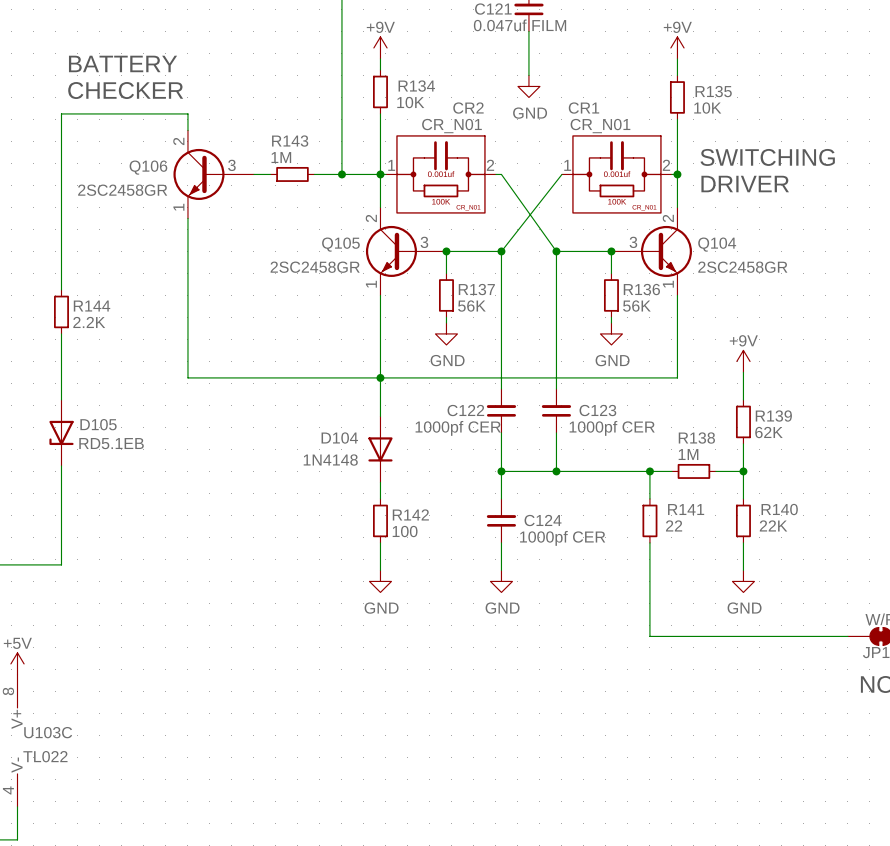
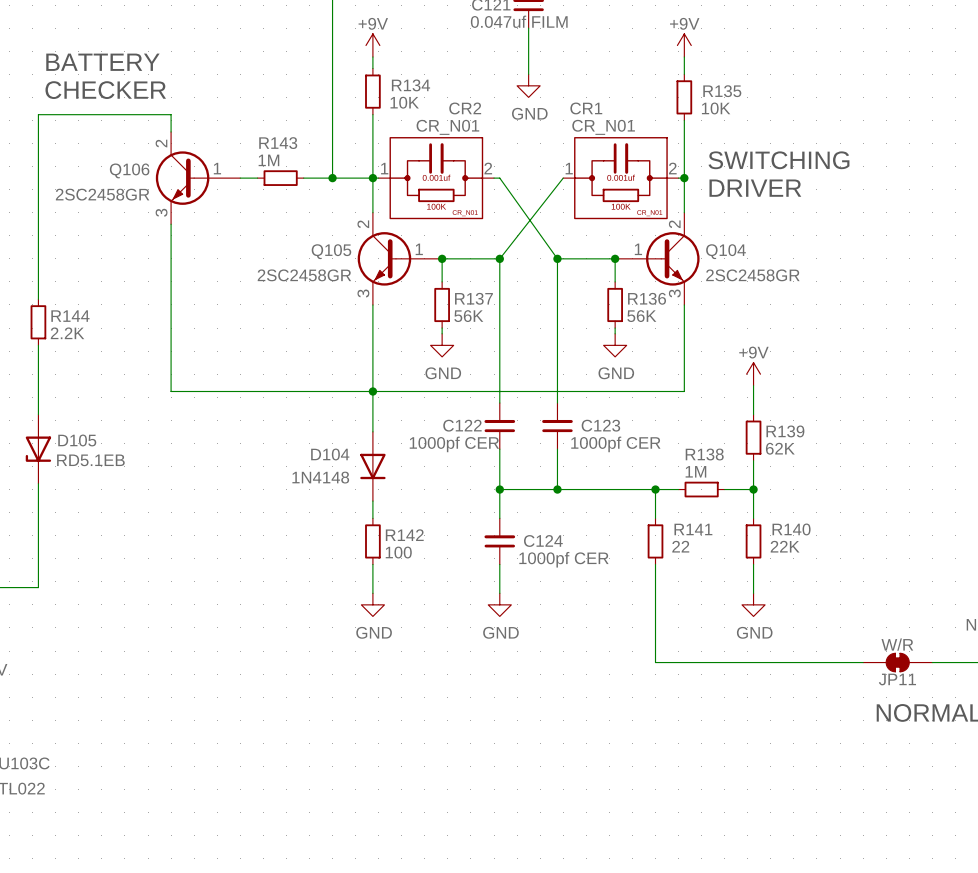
Q106 symbol: [173, 130, 254, 219] -> [155, 131, 241, 225]
Q105 symbol: [365, 207, 447, 296] -> [357, 212, 443, 305]
Q104 symbol: [611, 207, 692, 296] -> [615, 212, 700, 305]

